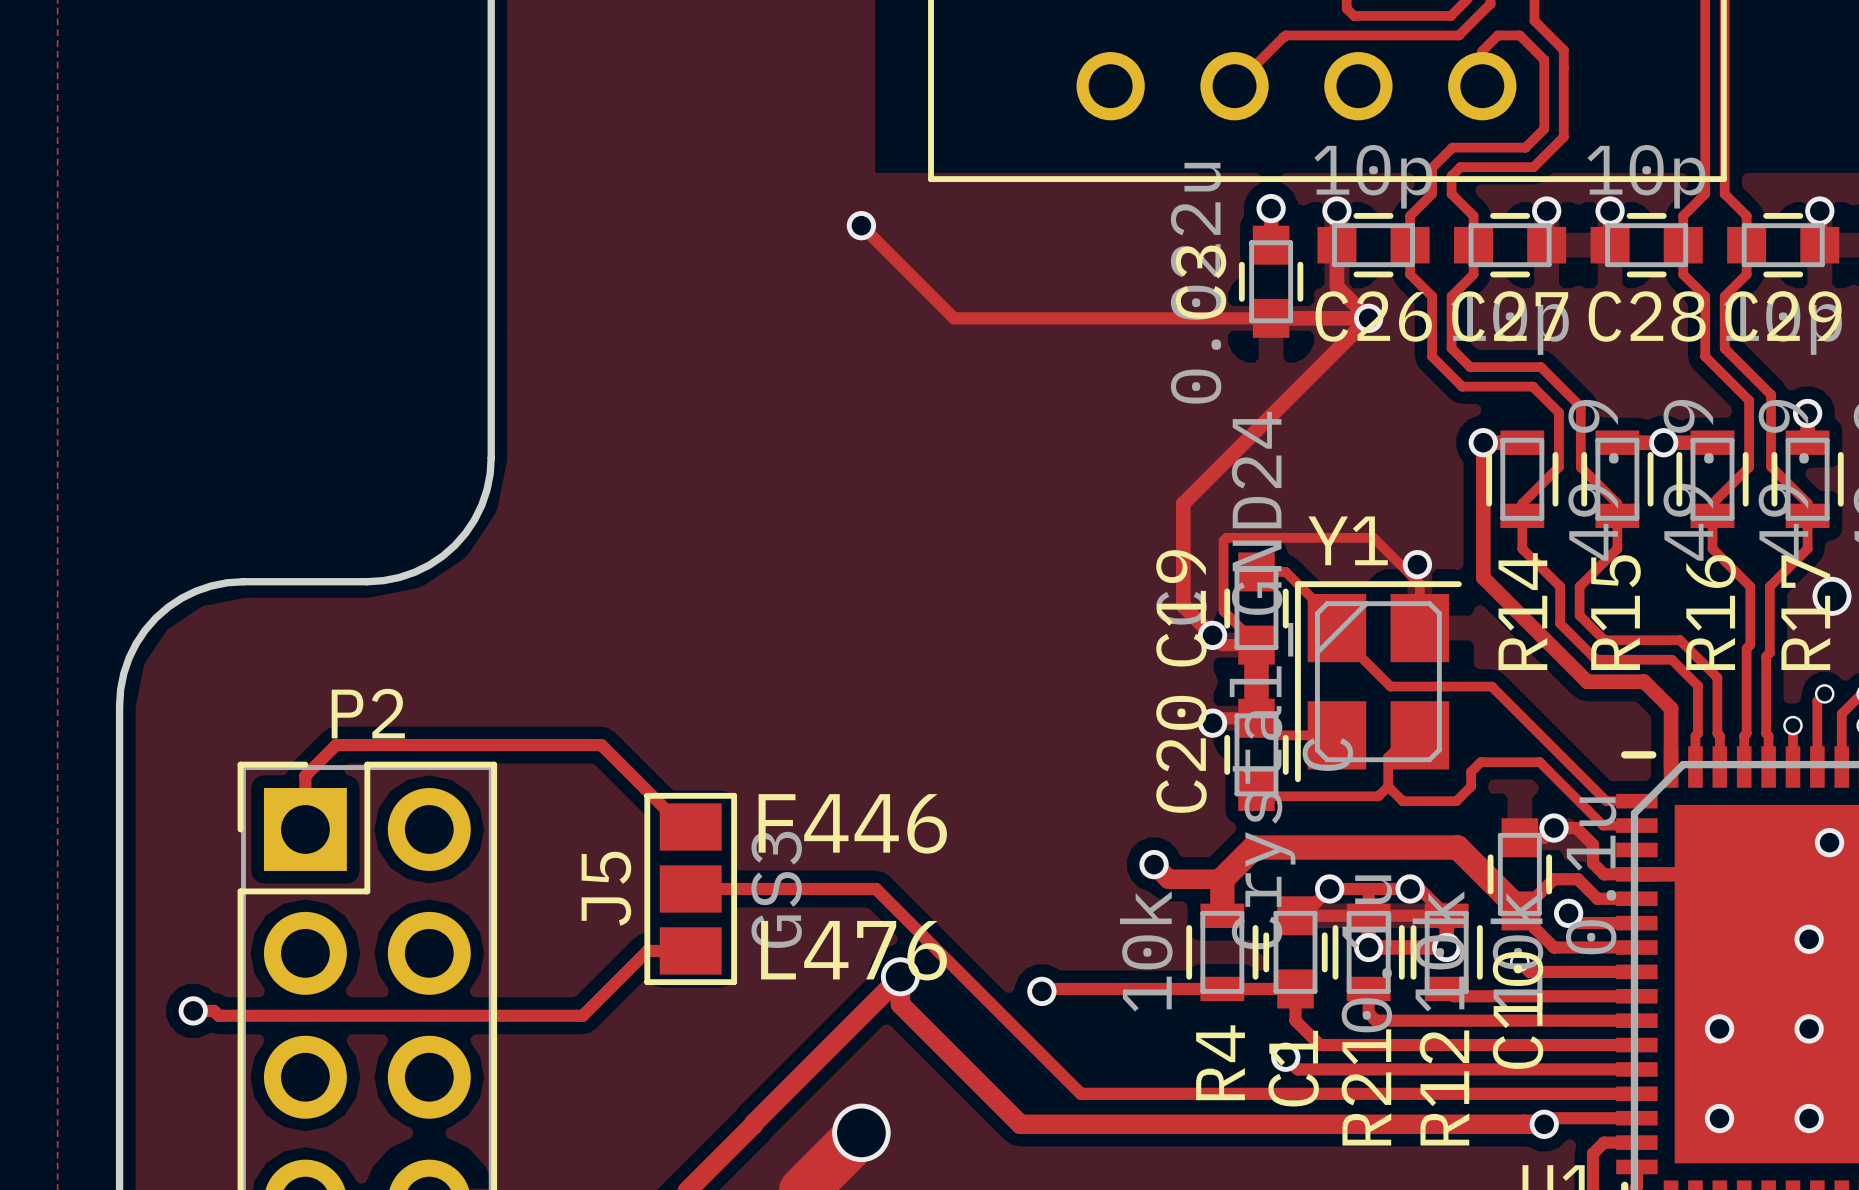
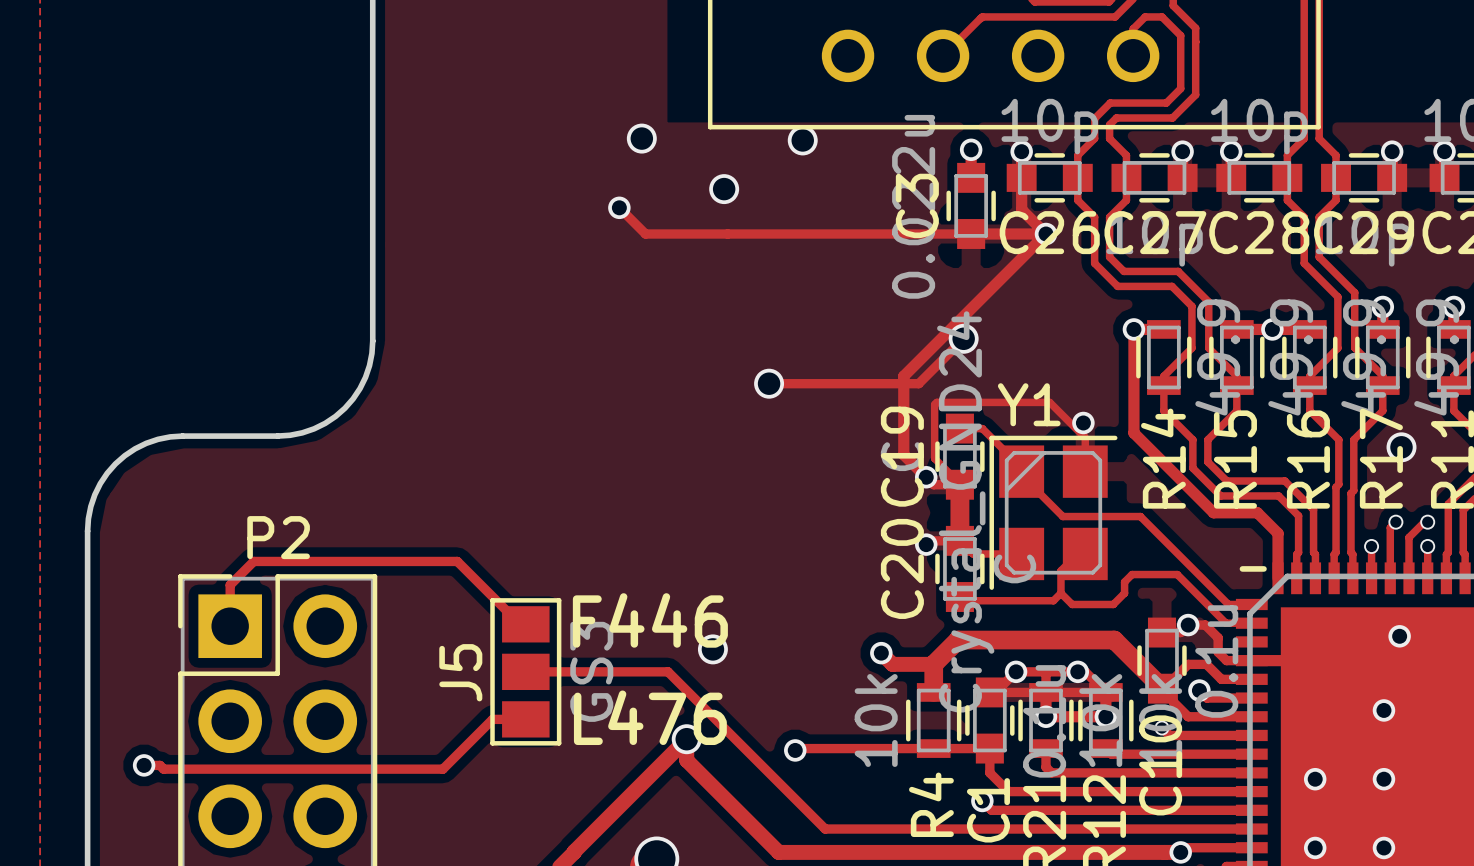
via: none -> (641, 138)
via: none -> (802, 140)
track: (861, 225) (954, 318) -> (619, 207) (645, 234) (727, 234)
via position: (861, 225) -> (619, 207)
via: none -> (724, 189)
track: none -> (963, 338) (918, 383) (769, 383)
via: none -> (963, 338)
via: none -> (769, 383)
via: none -> (712, 649)

